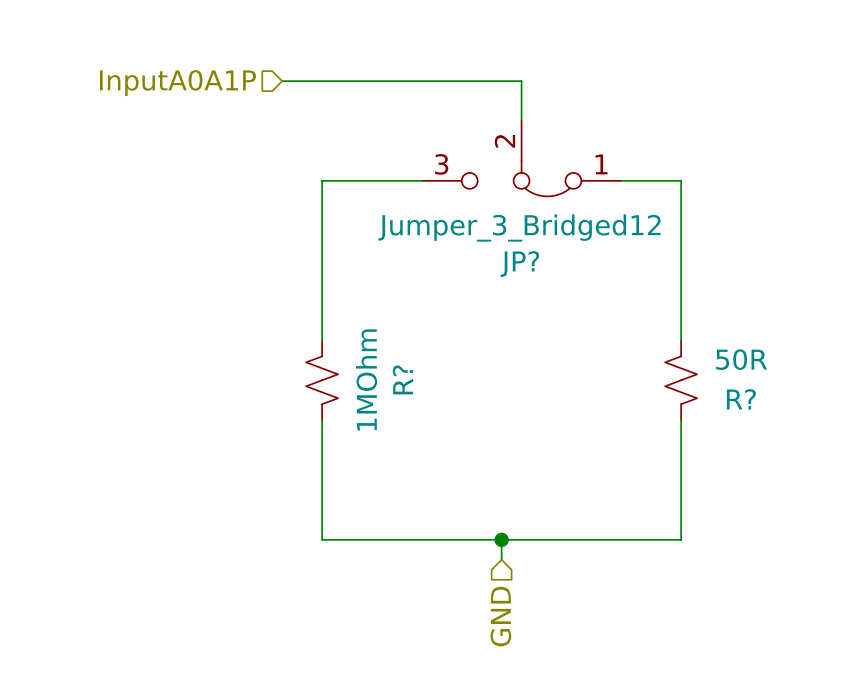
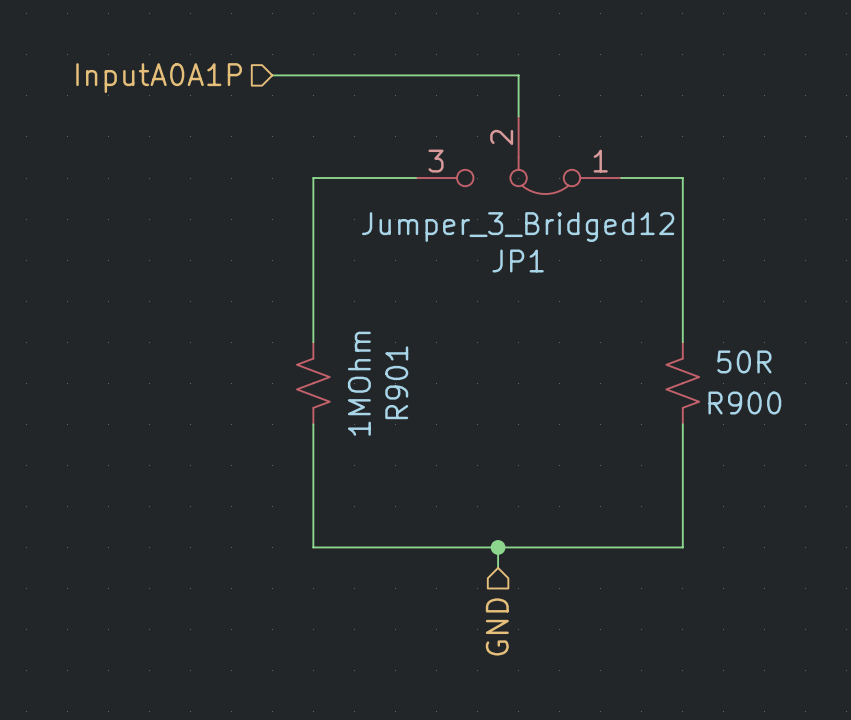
JP? name: JP? (519, 264) -> JP1 (518, 260)
R? name: R? (402, 379) -> R901 (396, 382)
R? name: R? (741, 399) -> R900 (744, 403)

